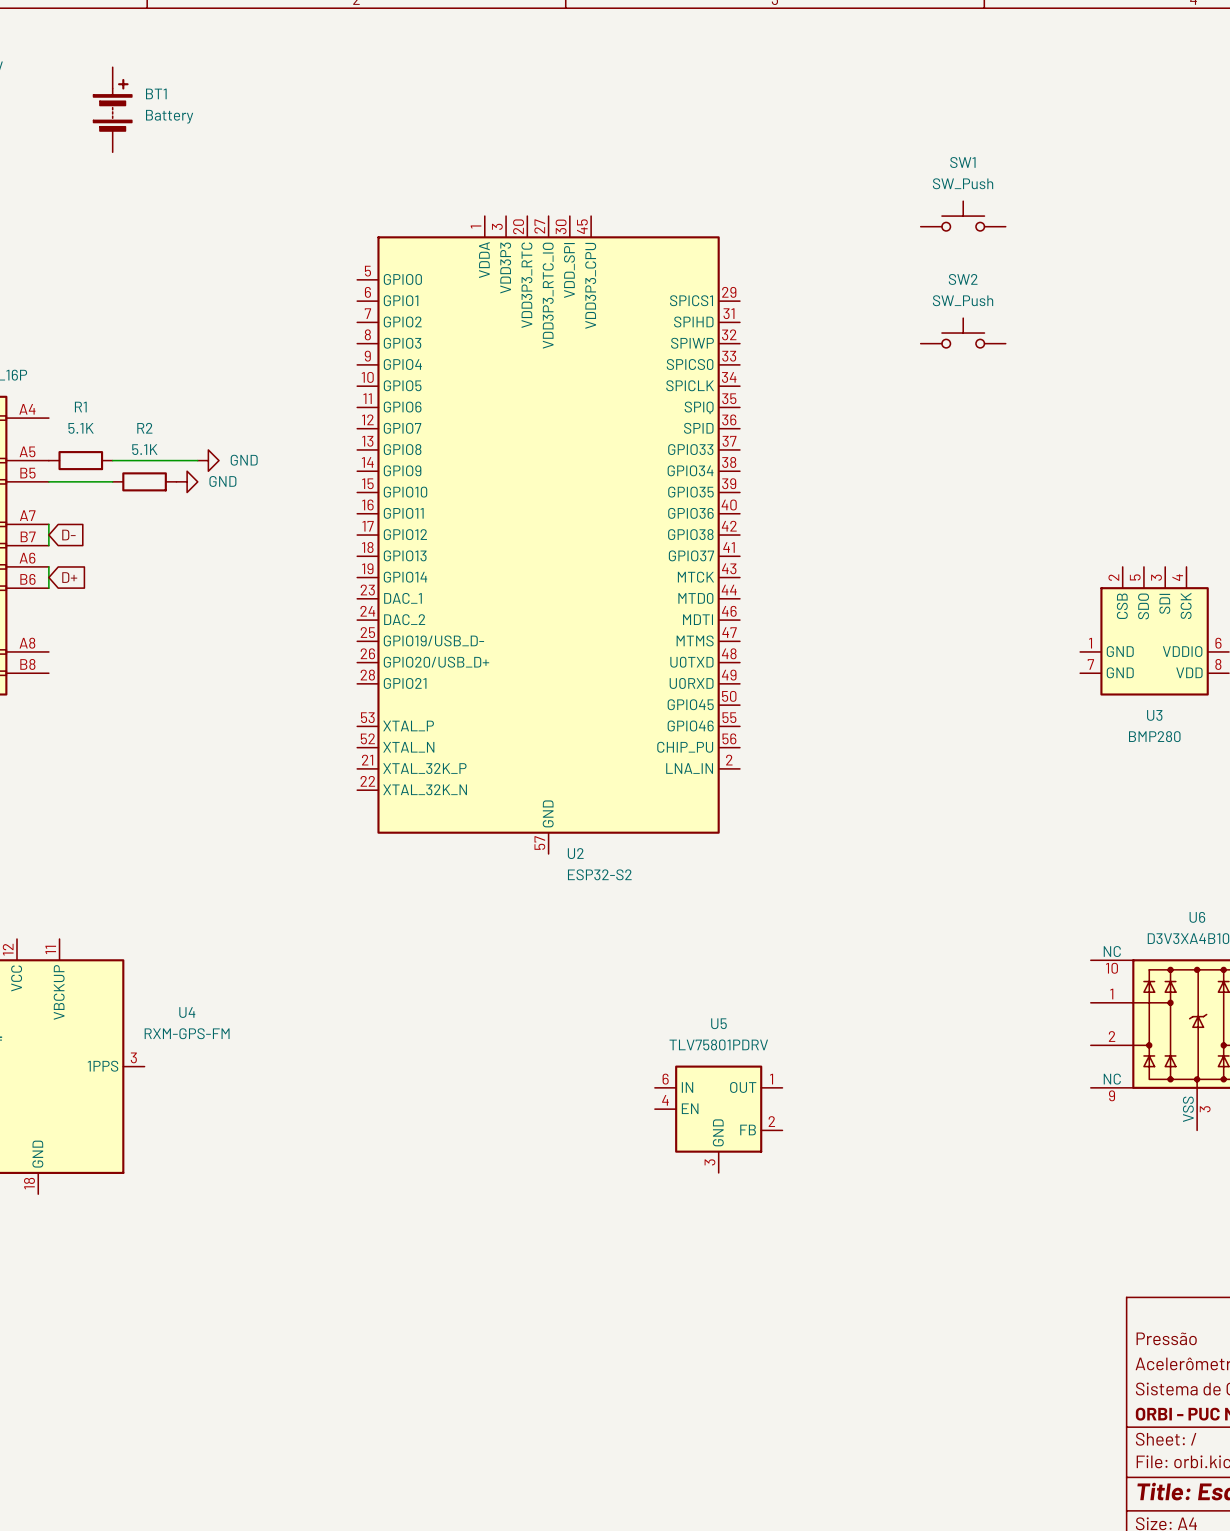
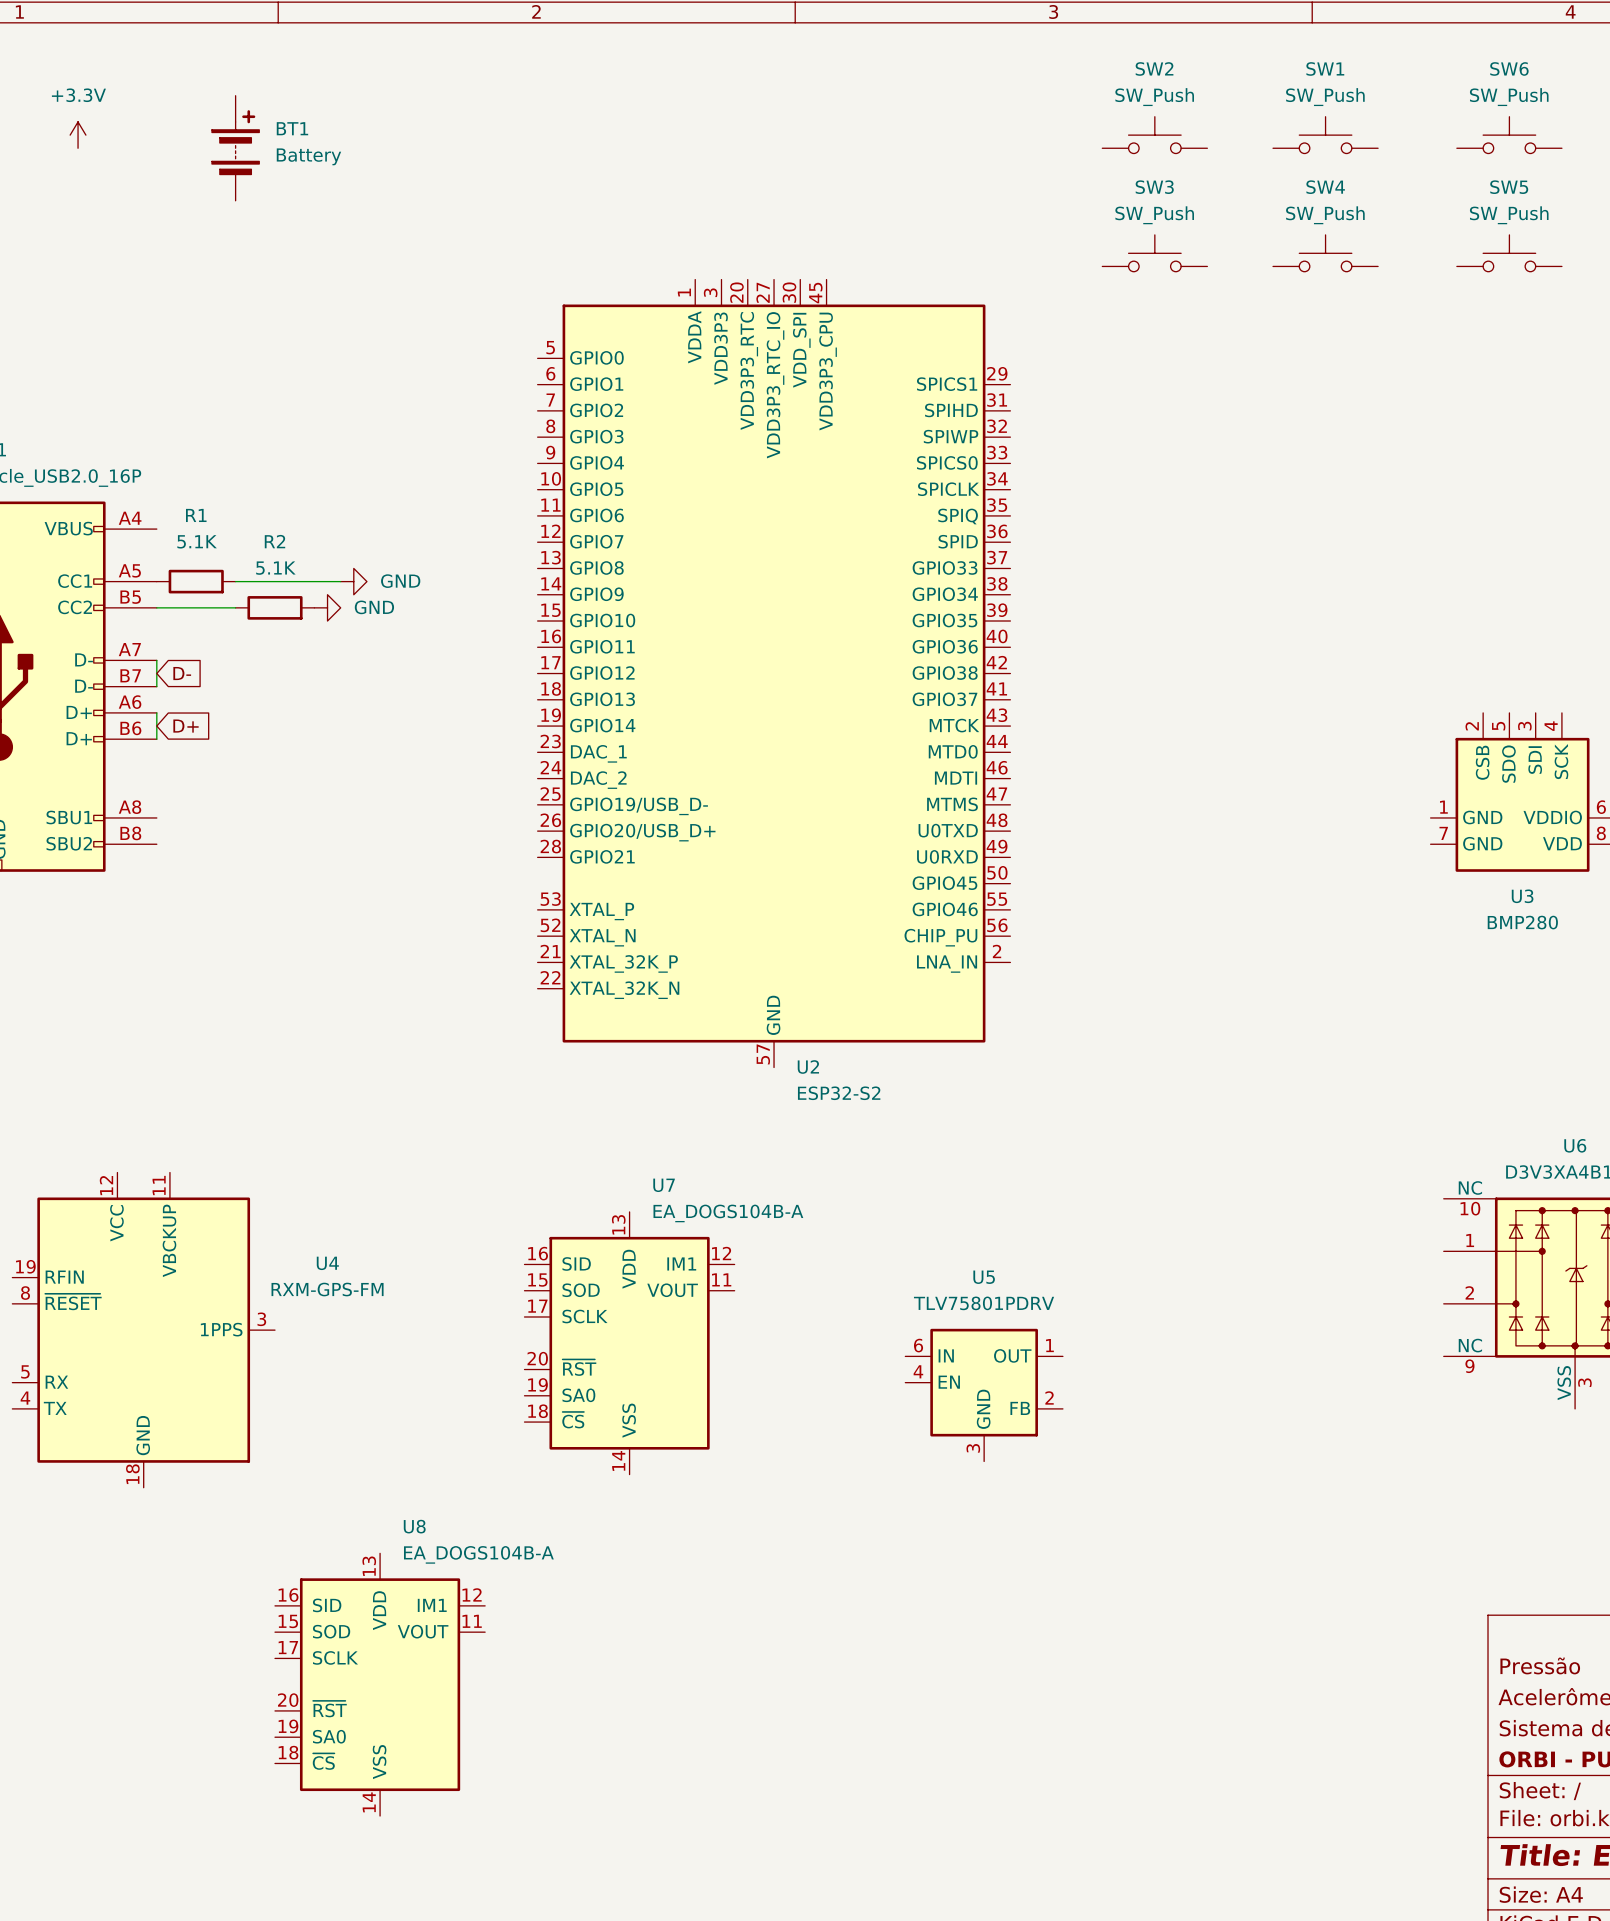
SW6: none -> SW_Push (1509, 135)
SW3: none -> SW_Push (1154, 253)
SW4: none -> SW_Push (1325, 253)
SW5: none -> SW_Push (1509, 253)
SW1 position: (963, 216) -> (1325, 135)
SW2 position: (963, 333) -> (1154, 135)
U7: none -> EA_DOGS104B-A (629, 1343)
U8: none -> EA_DOGS104B-A (380, 1684)

